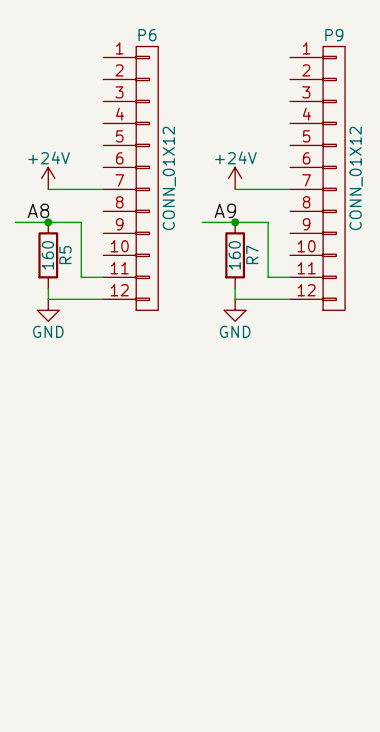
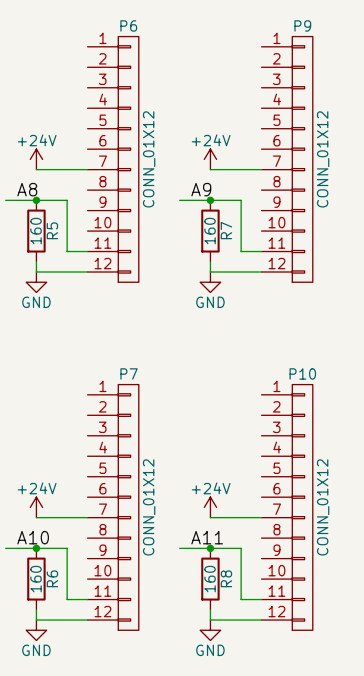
power symbol: none -> +24V (36, 507)
P7: none -> CONN_01X12 (113, 507)
power symbol: none -> +24V (210, 507)
P10: none -> CONN_01X12 (287, 507)
wire: none -> (36, 517) (87, 517)
wire: none -> (210, 517) (261, 517)
label: none -> A10 (33, 537)
label: none -> A11 (207, 537)
wire: none -> (5, 548) (67, 548) (67, 599) (87, 599)
junction: none -> (36, 548)
wire: none -> (179, 548) (241, 548) (241, 599) (261, 599)
junction: none -> (210, 548)
R6: none -> 160 (36, 579)
R8: none -> 160 (210, 579)
wire: none -> (36, 609) (36, 620) (87, 620)
wire: none -> (210, 609) (210, 620) (261, 620)
power symbol: none -> GND (36, 630)
power symbol: none -> GND (210, 630)

